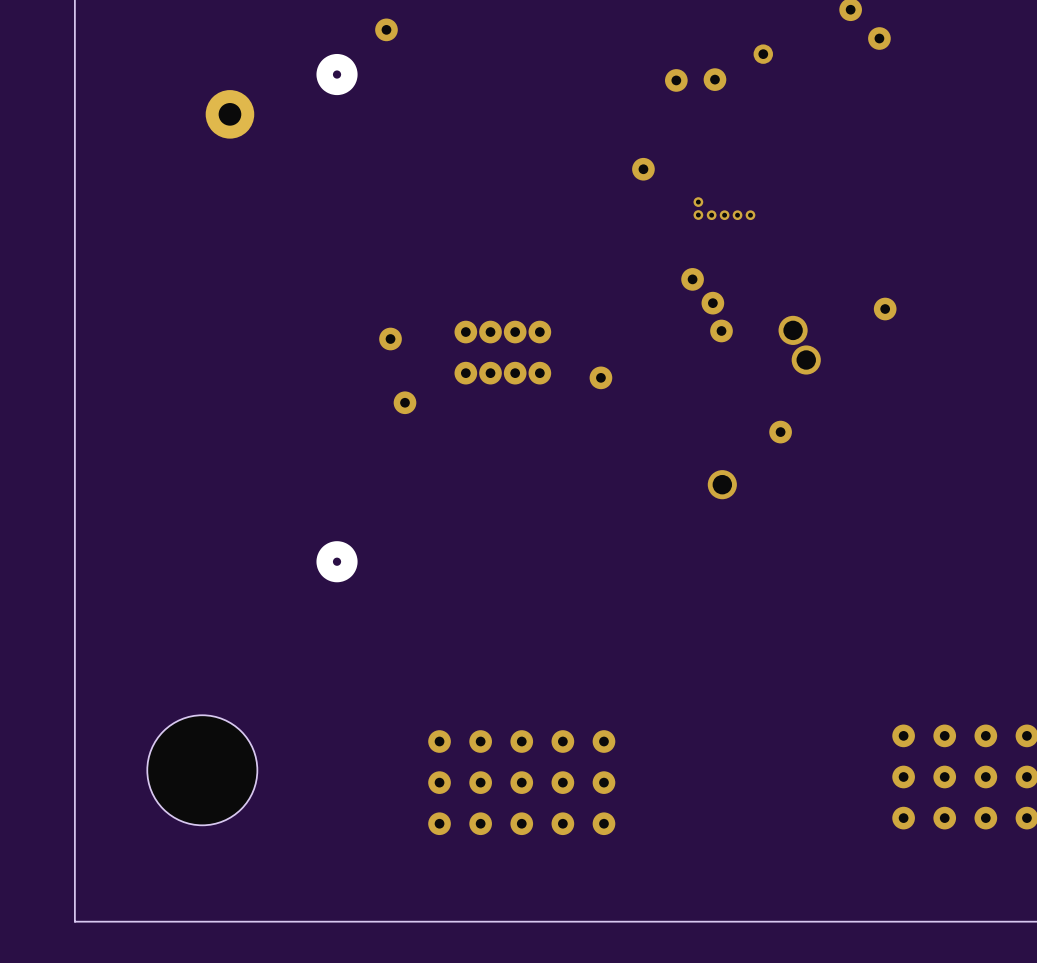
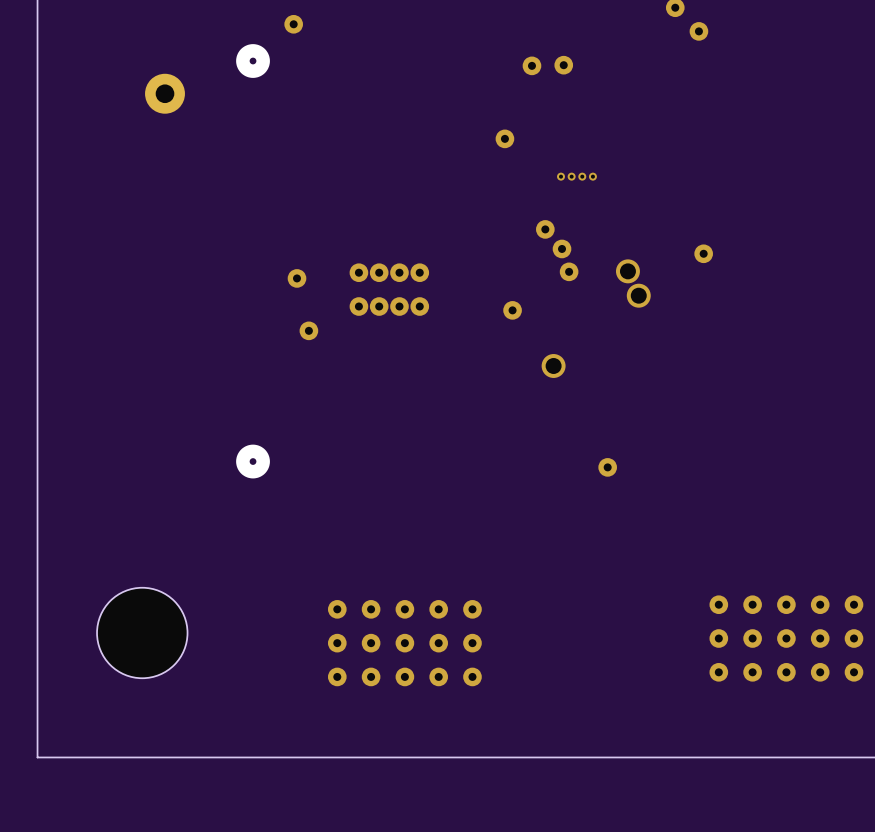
via: (763, 54) -> none
via: (698, 202) -> none
via: (698, 215) -> none
via position: (600, 377) -> (512, 310)
via: (780, 432) -> none
via position: (722, 484) -> (553, 365)
via: none -> (607, 467)

